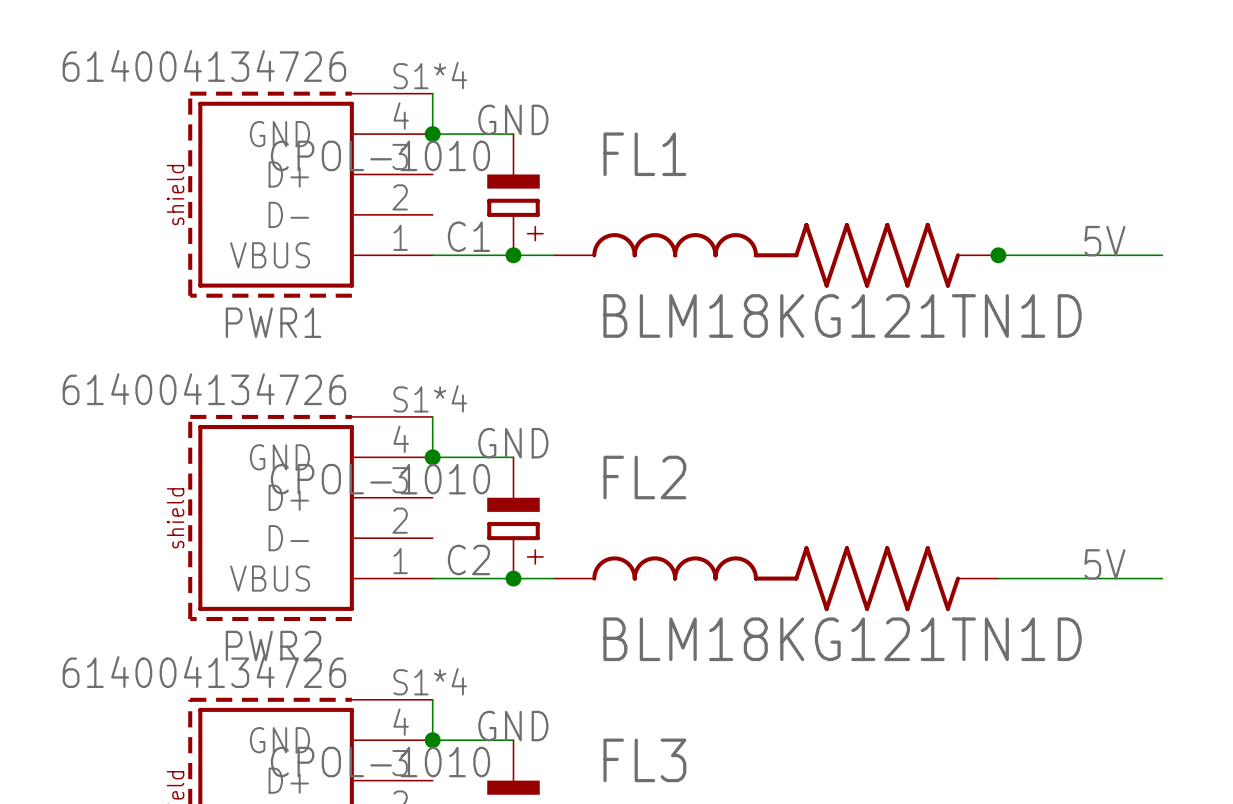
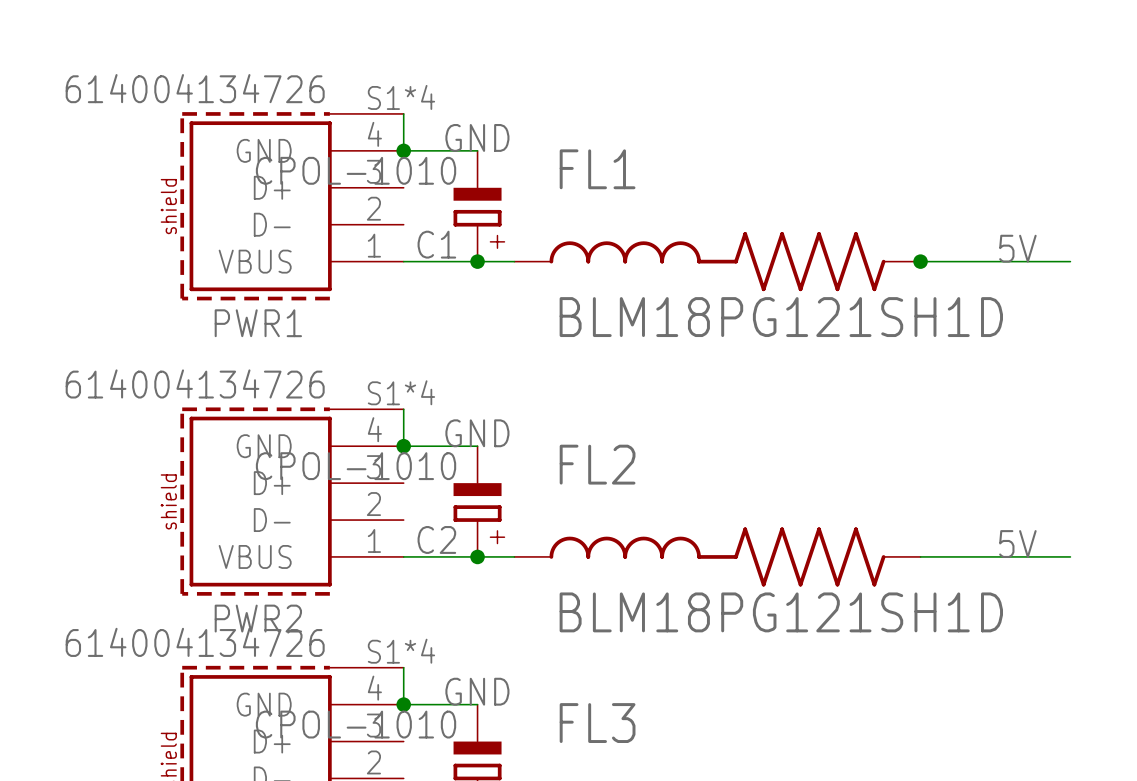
FL1 value: BLM18KG121TN1D (842, 315) -> BLM18PG121SH1D (781, 317)
FL2 value: BLM18KG121TN1D (842, 639) -> BLM18PG121SH1D (781, 612)

